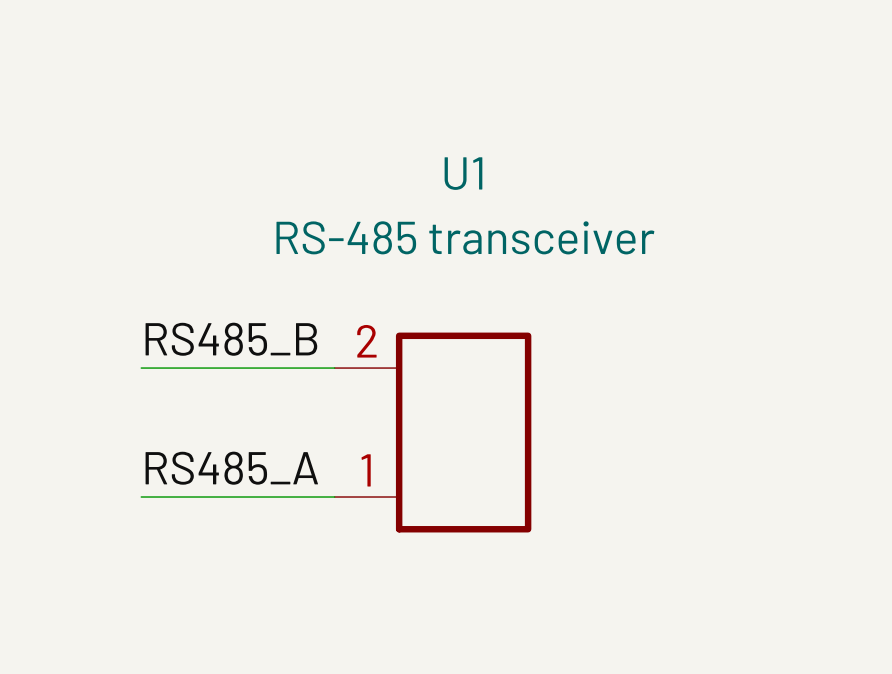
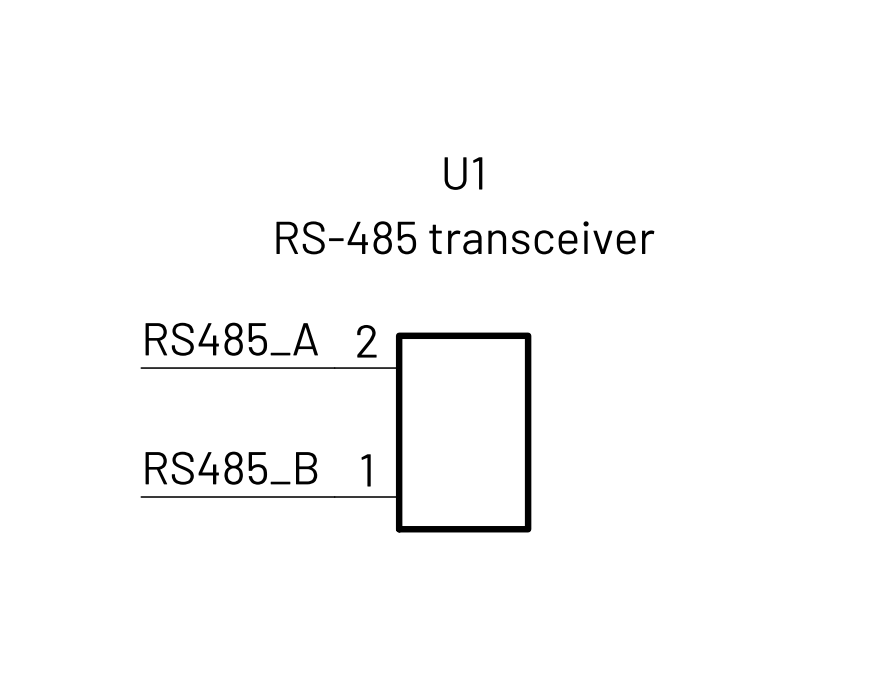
label: RS485_B (231, 339) -> RS485_A (231, 339)
label: RS485_A (231, 468) -> RS485_B (231, 468)

